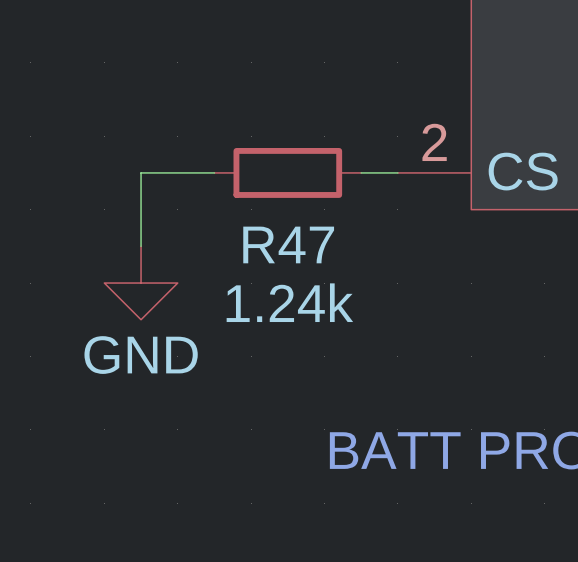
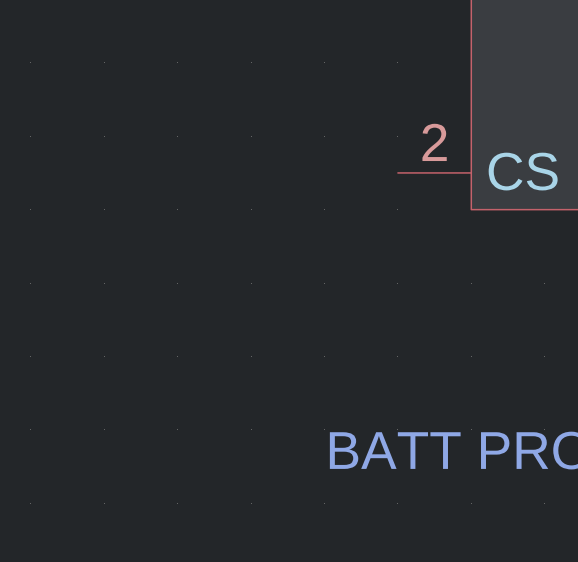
wire: (214, 172) (141, 172) (141, 246) -> none
R47: 1.24k (287, 172) -> none
wire: (361, 172) (397, 172) -> none
power symbol: GND (141, 283) -> none

